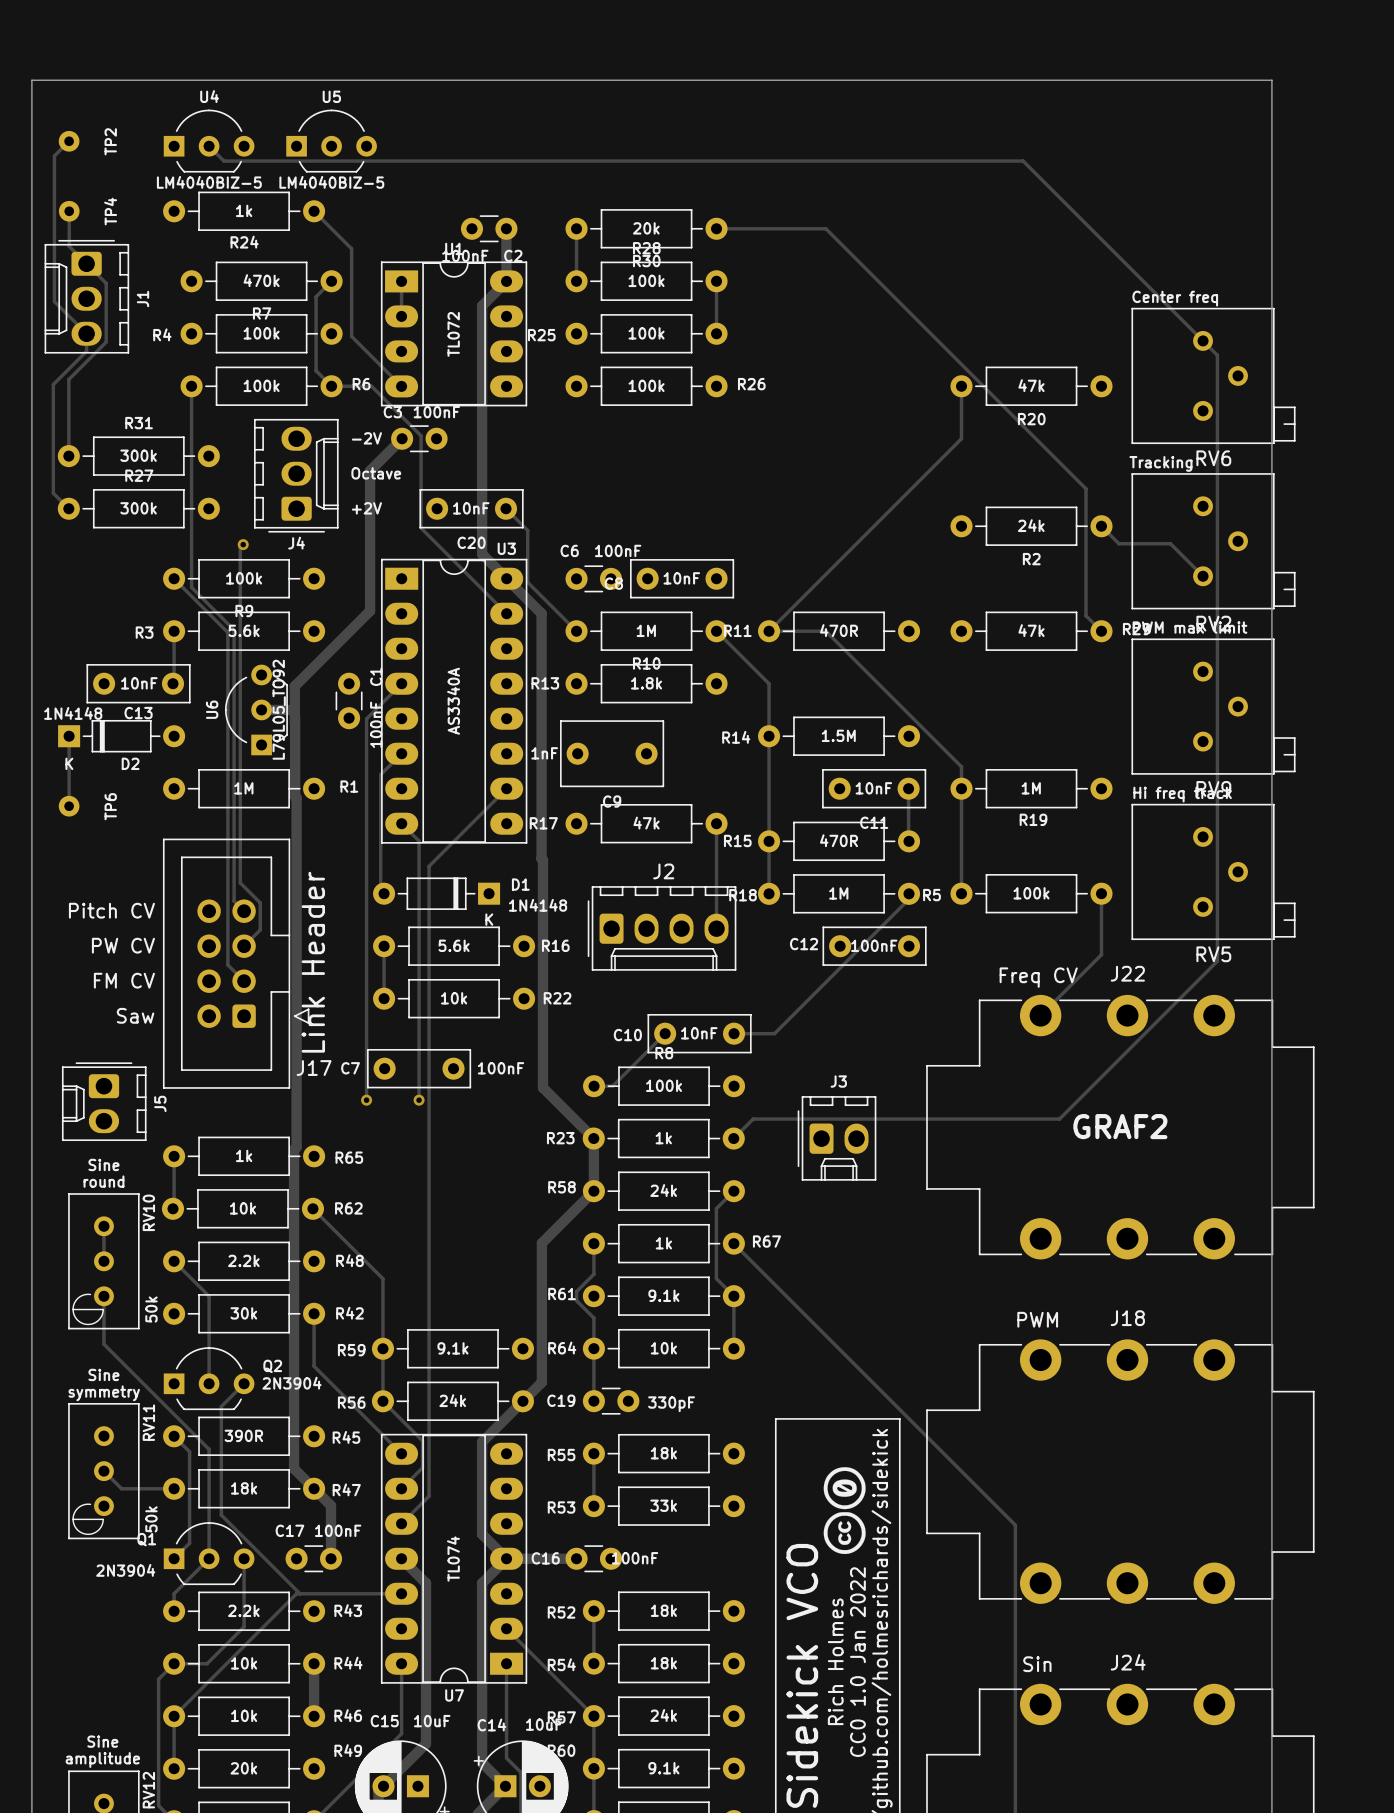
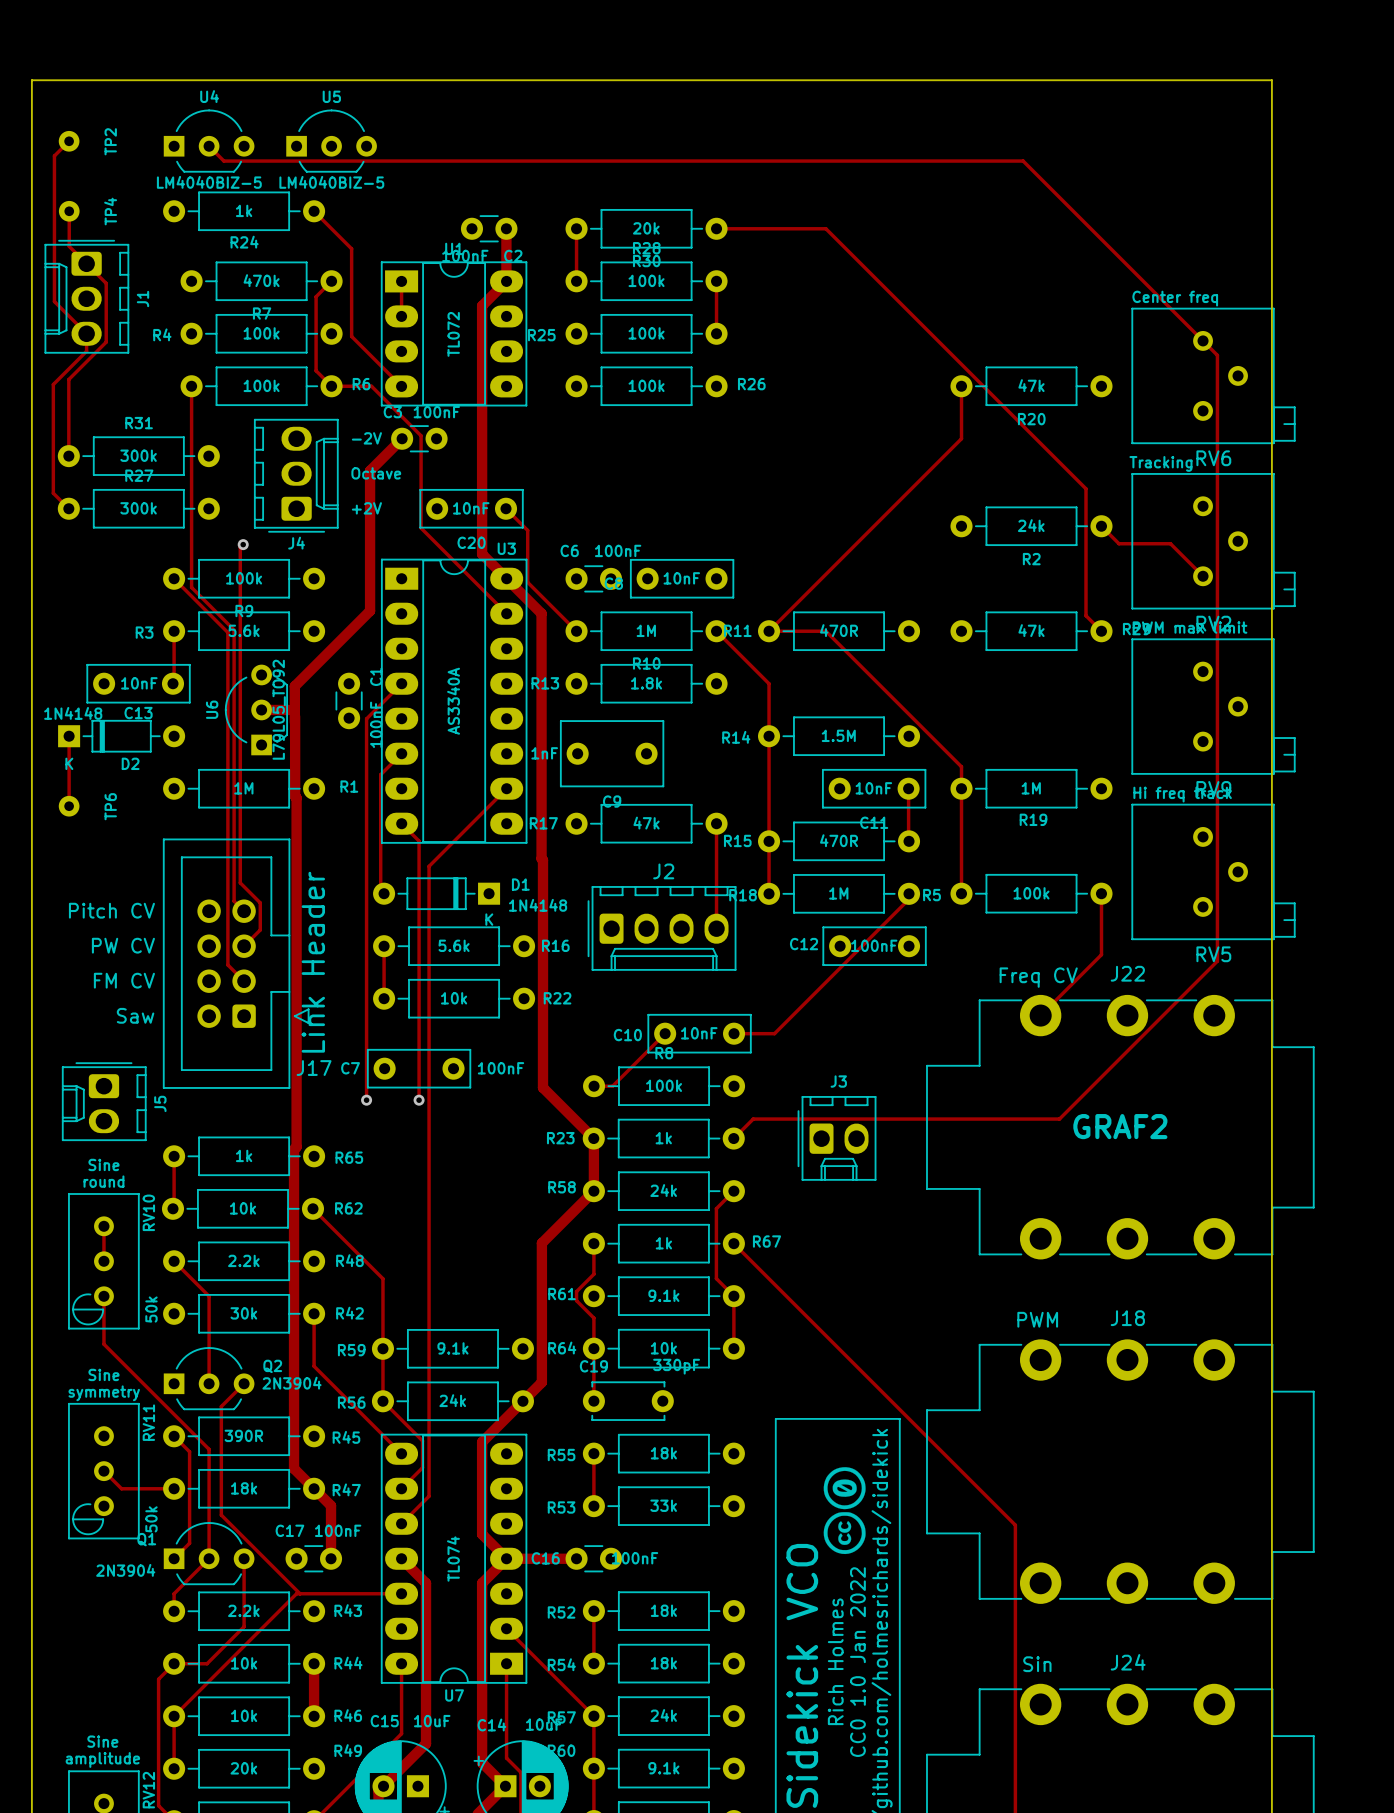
C19 footprint: [582, 1387, 640, 1415] -> [582, 1381, 674, 1421]
C19 name position: C19 (561, 1400) -> C19 (593, 1366)
C19 value position: 330pF (671, 1404) -> 330pF (676, 1366)

